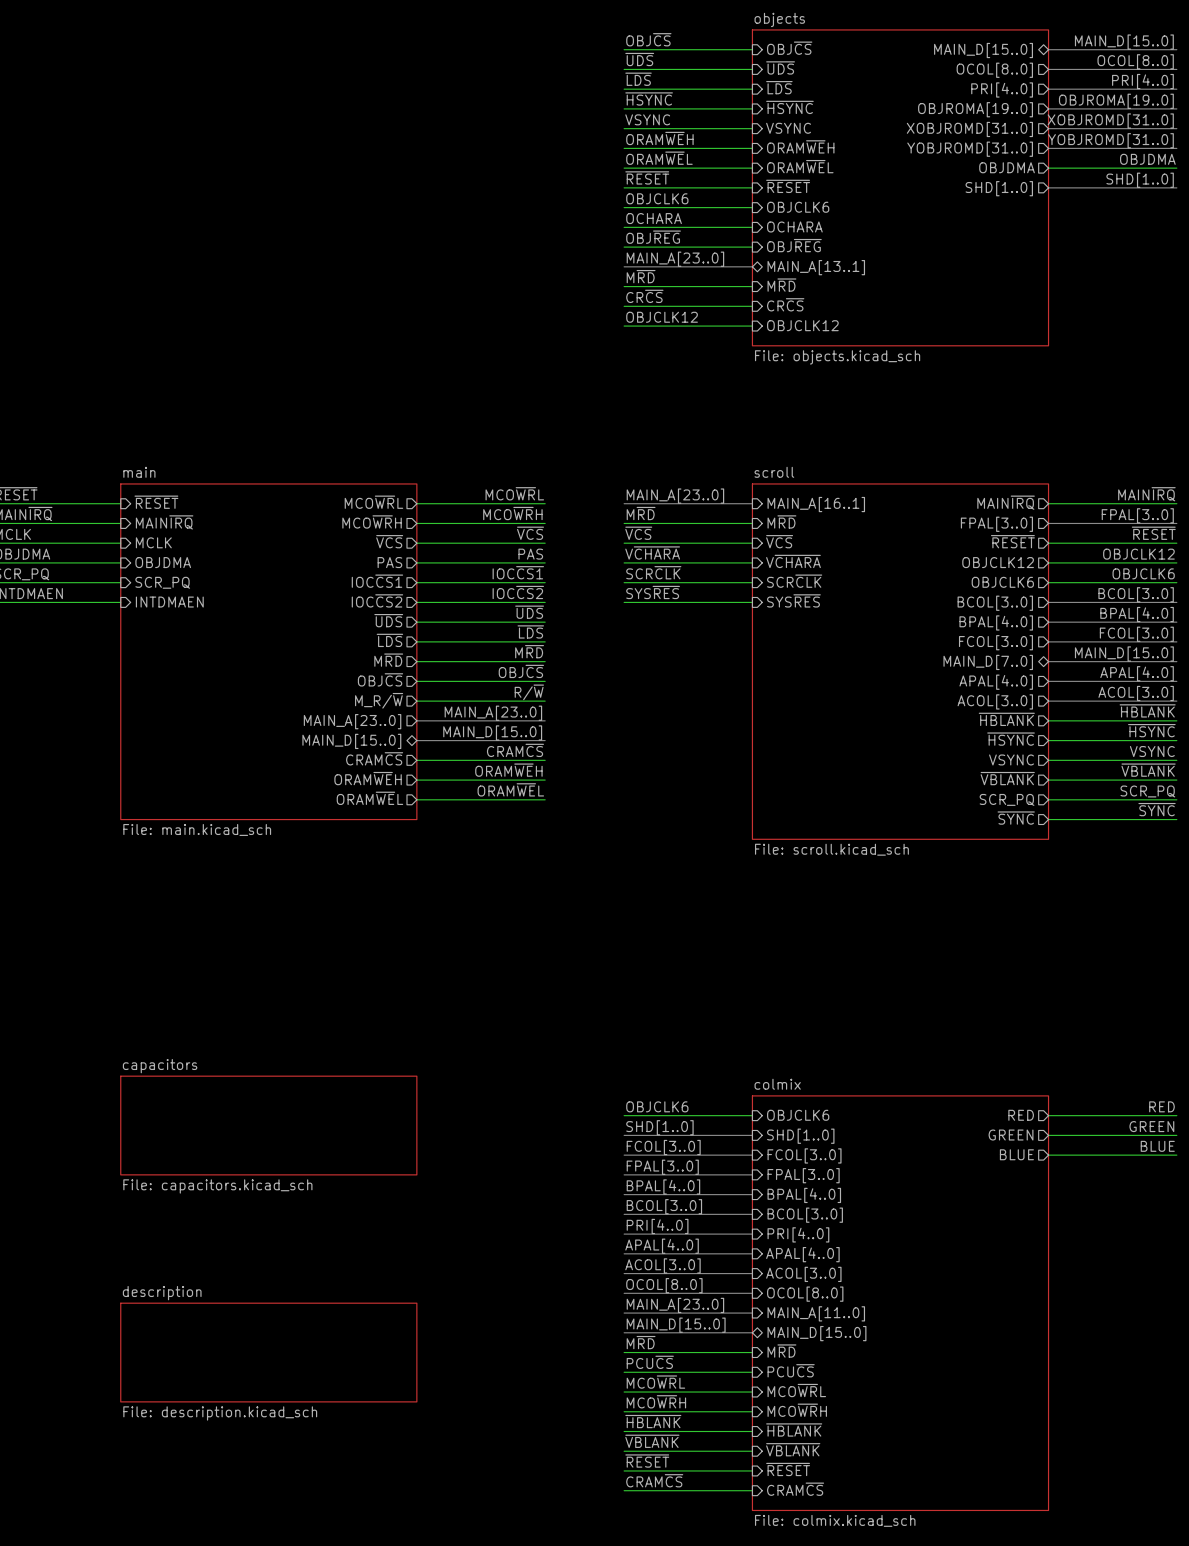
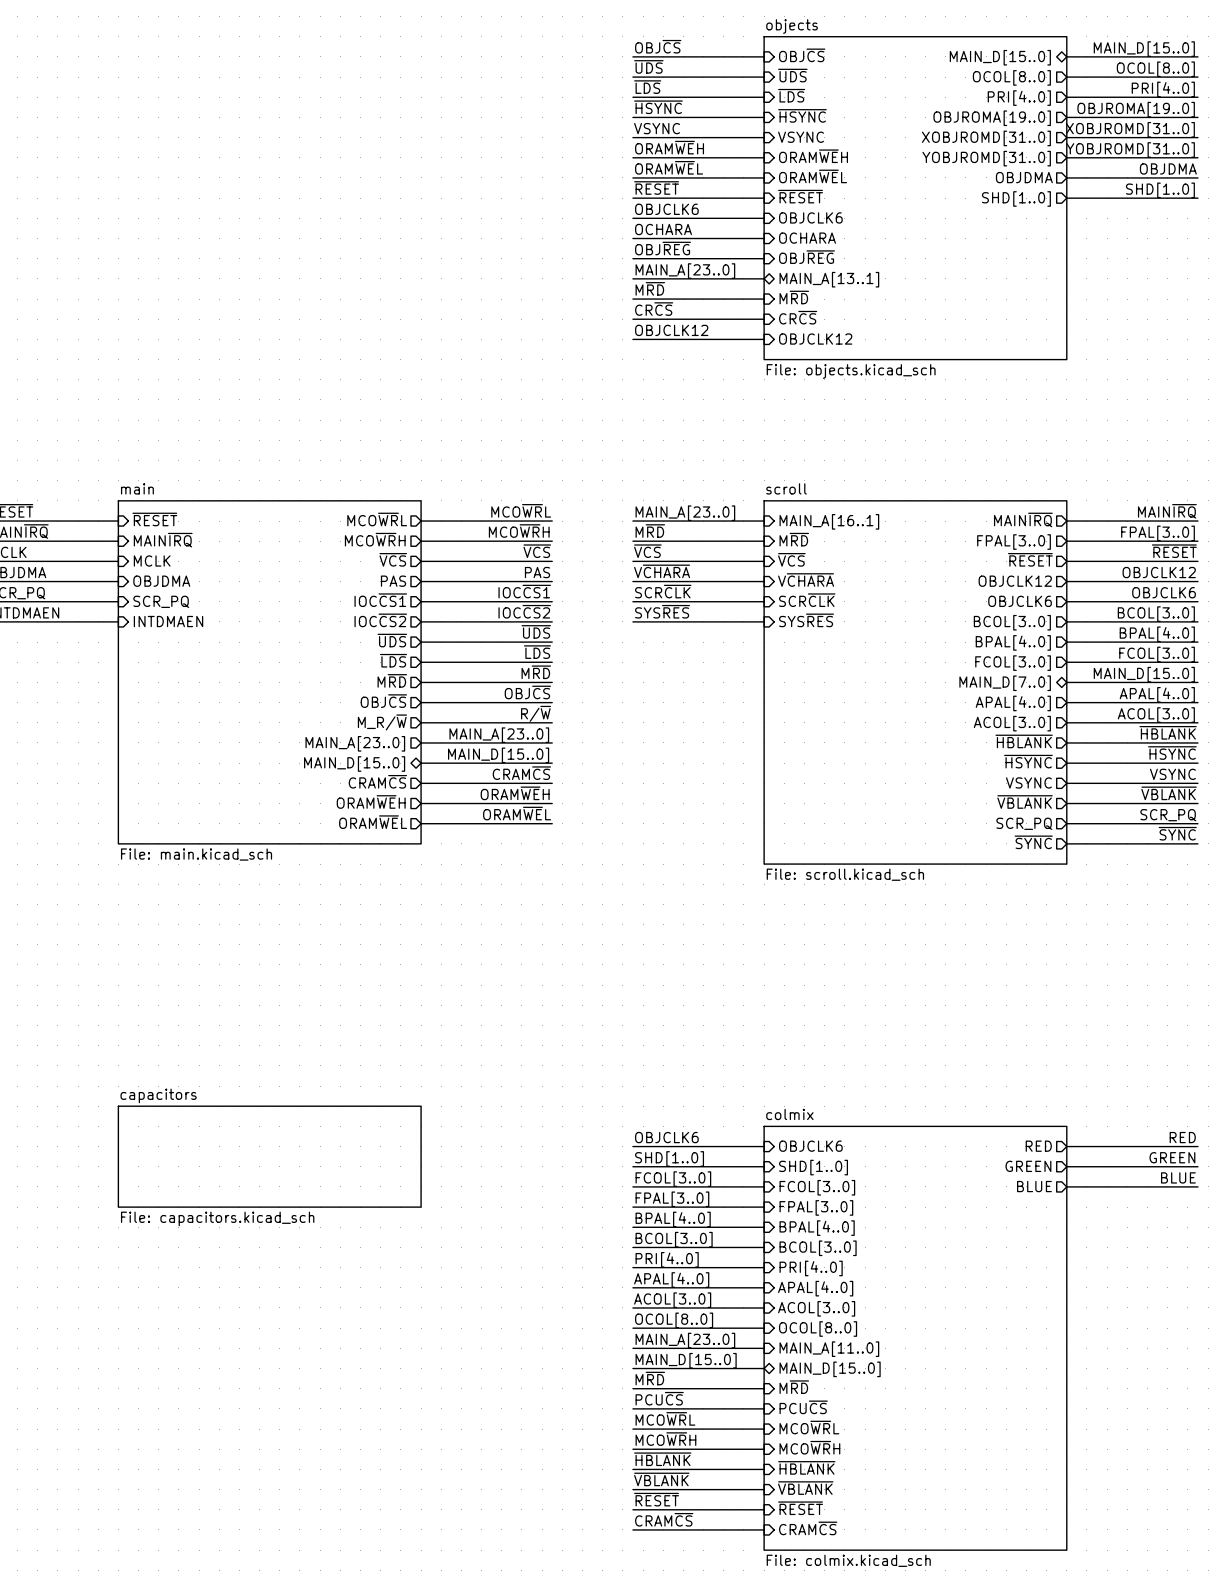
sheet description: File: description.kicad_sch (268, 1352) -> none

